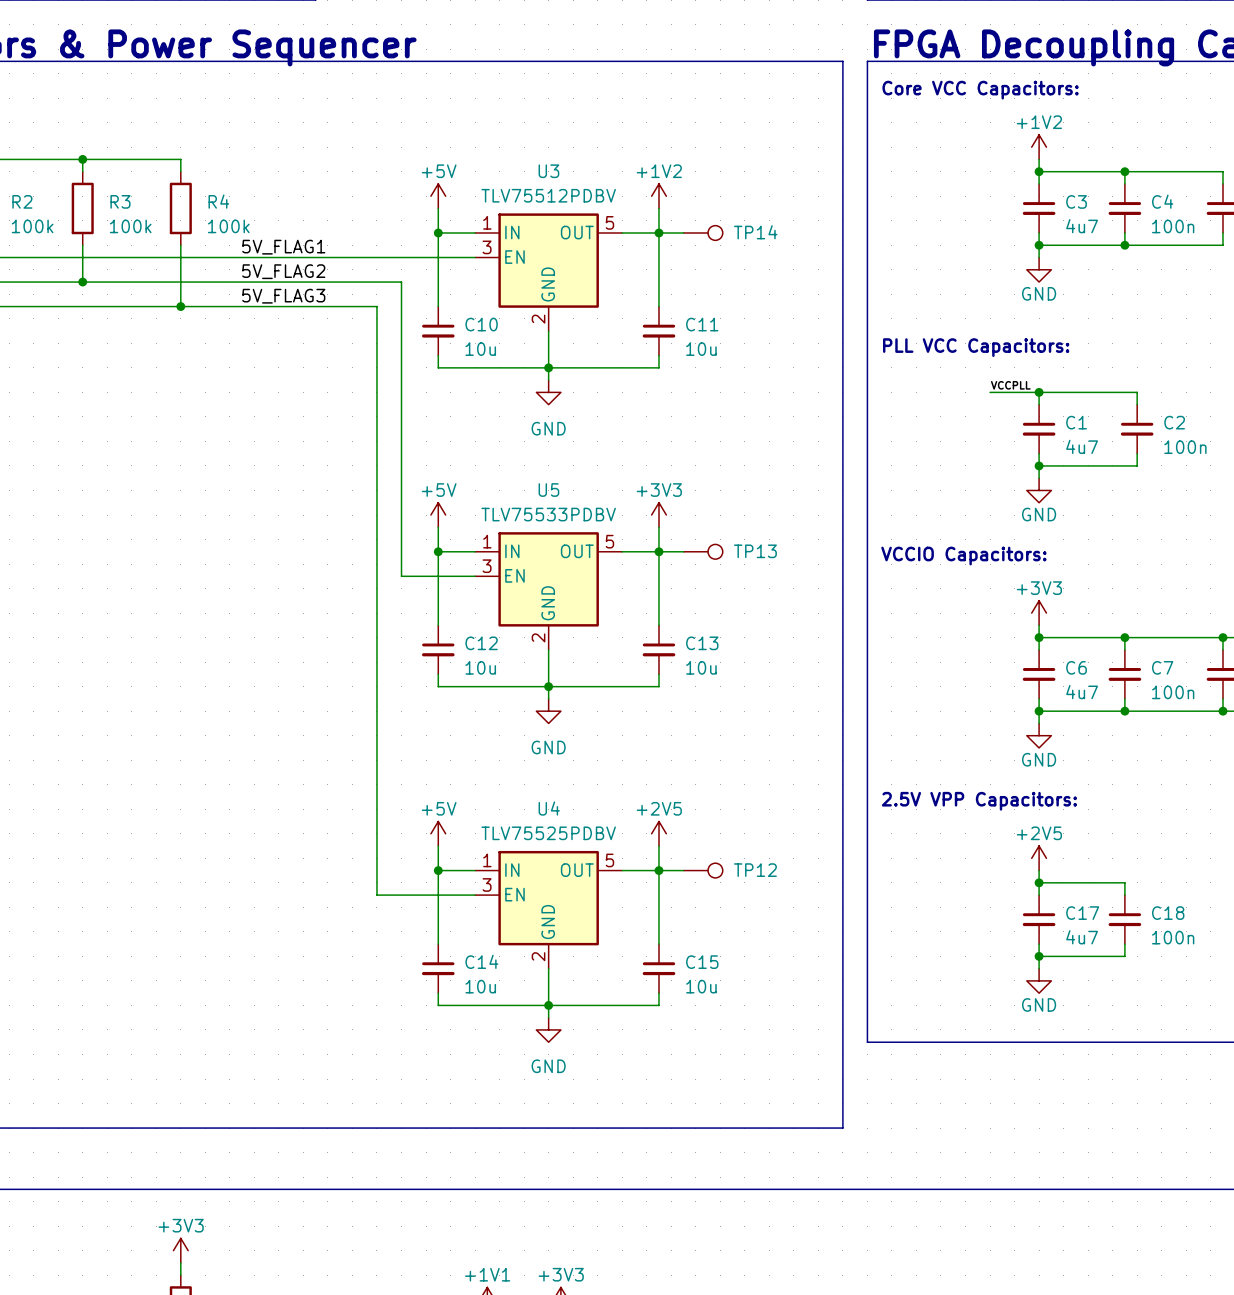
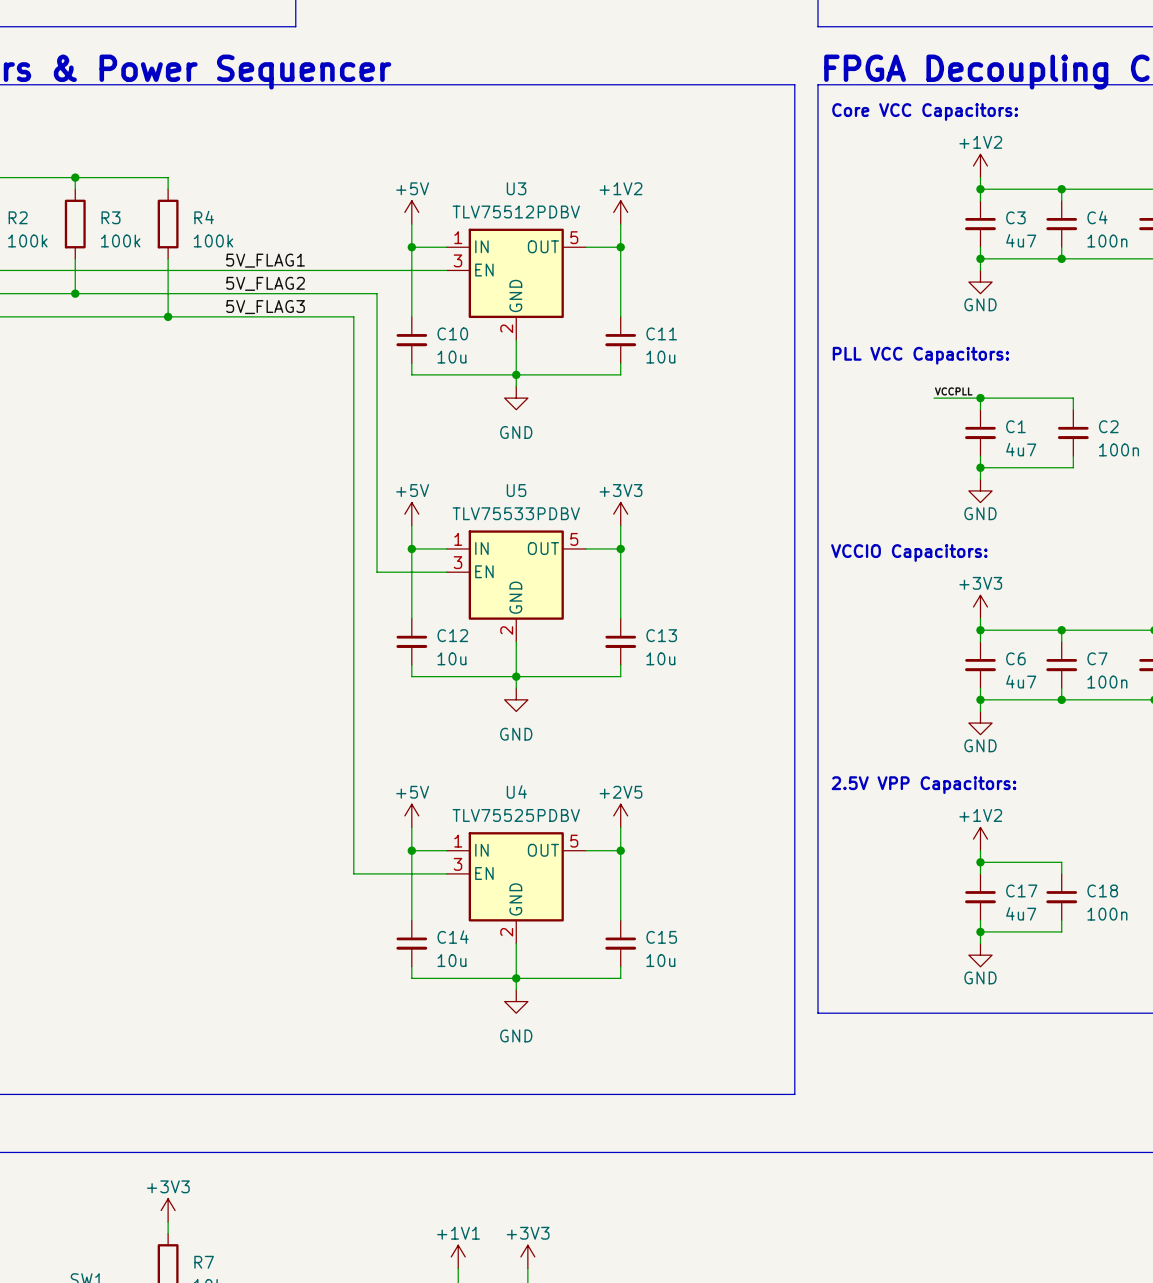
wire: (658, 232) (683, 232) -> none
TP14: (703, 232) -> none
wire: (658, 551) (683, 551) -> none
TP13: (703, 551) -> none
power symbol: +2V5 (1039, 858) -> +1V2 (980, 839)
wire: (658, 870) (683, 870) -> none
TP12: (703, 870) -> none

